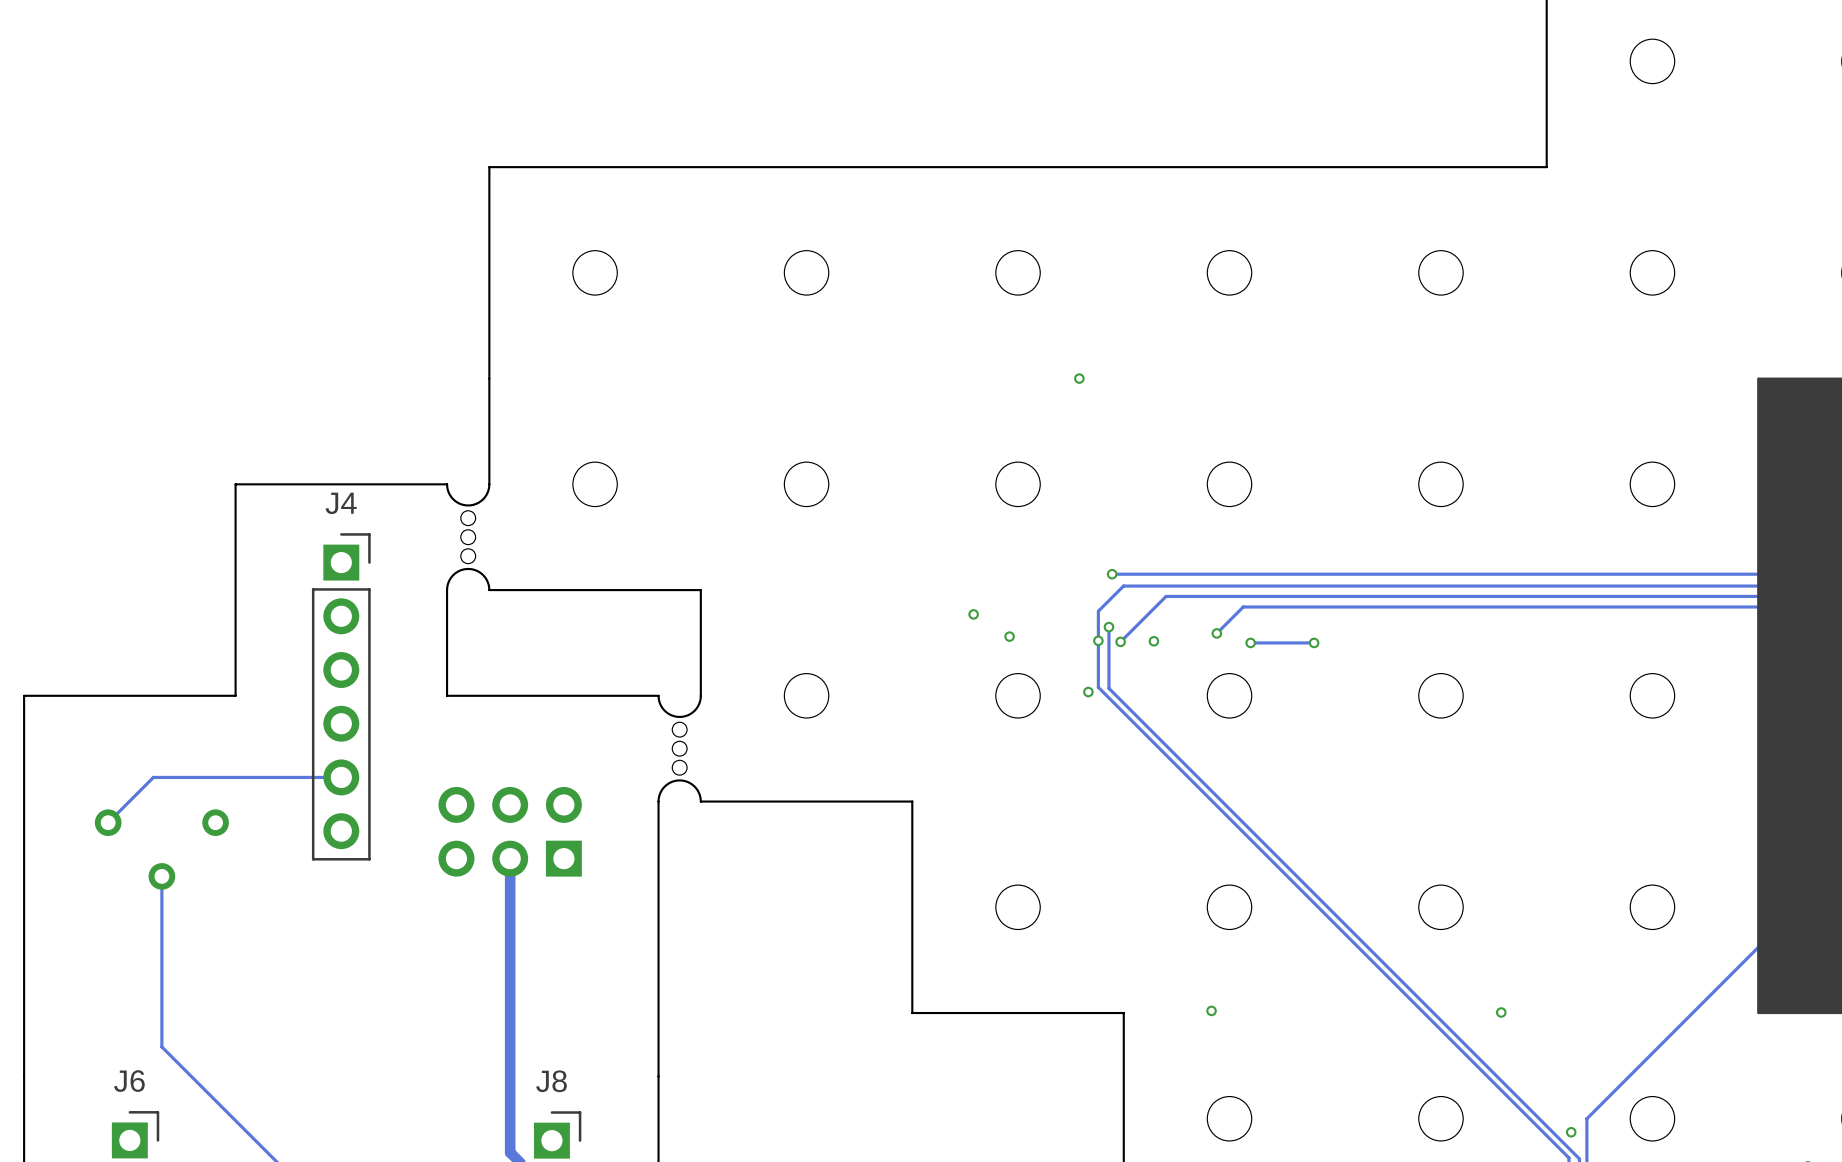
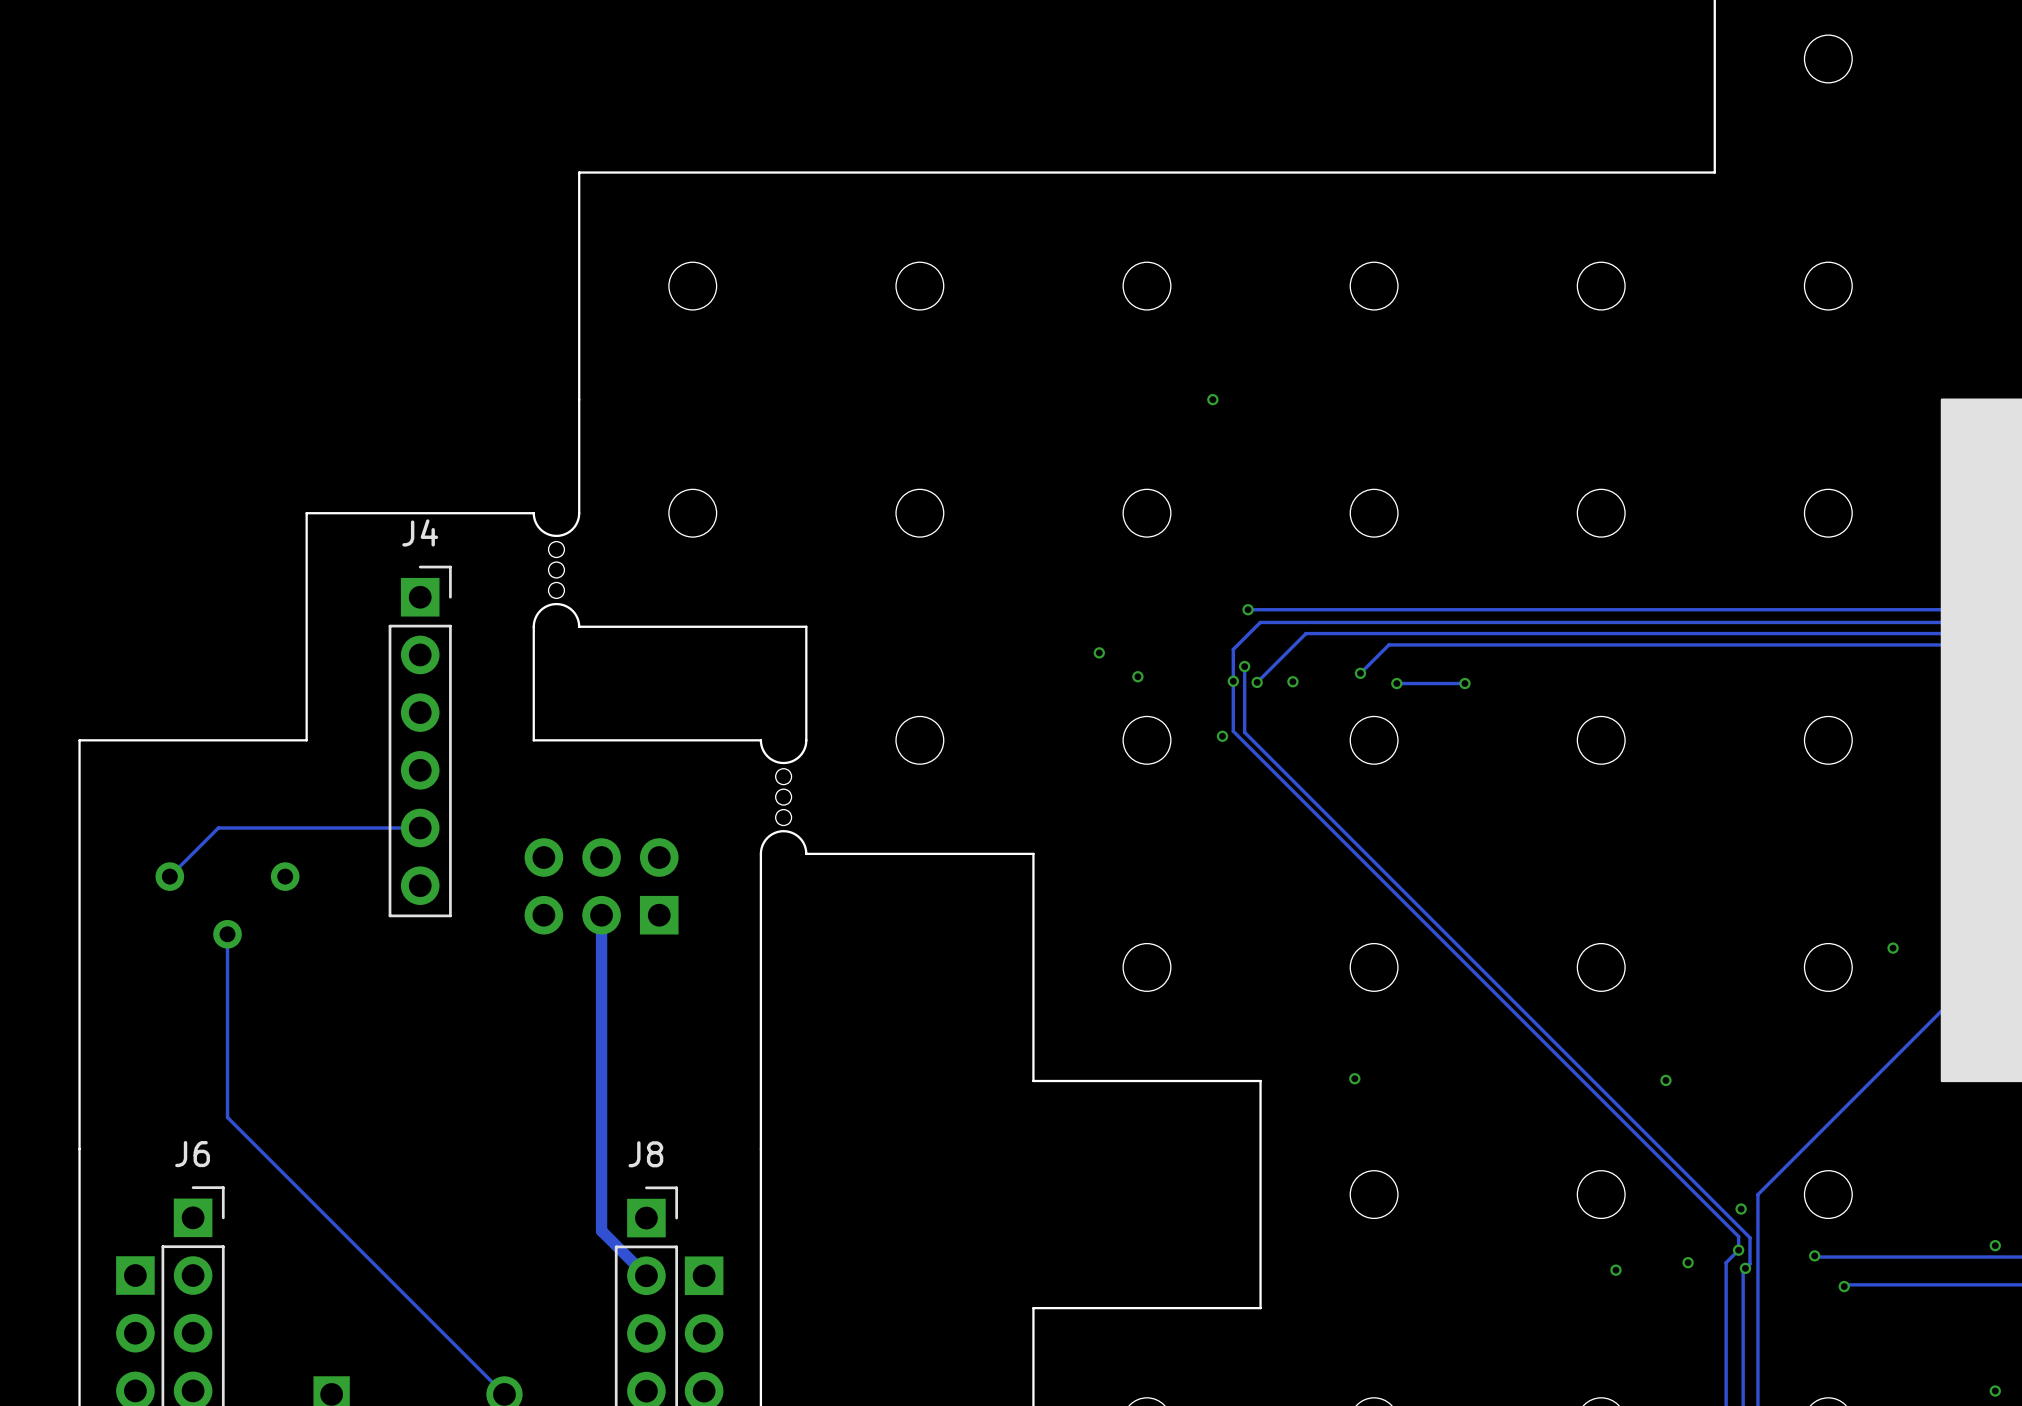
via: none -> (1893, 948)

